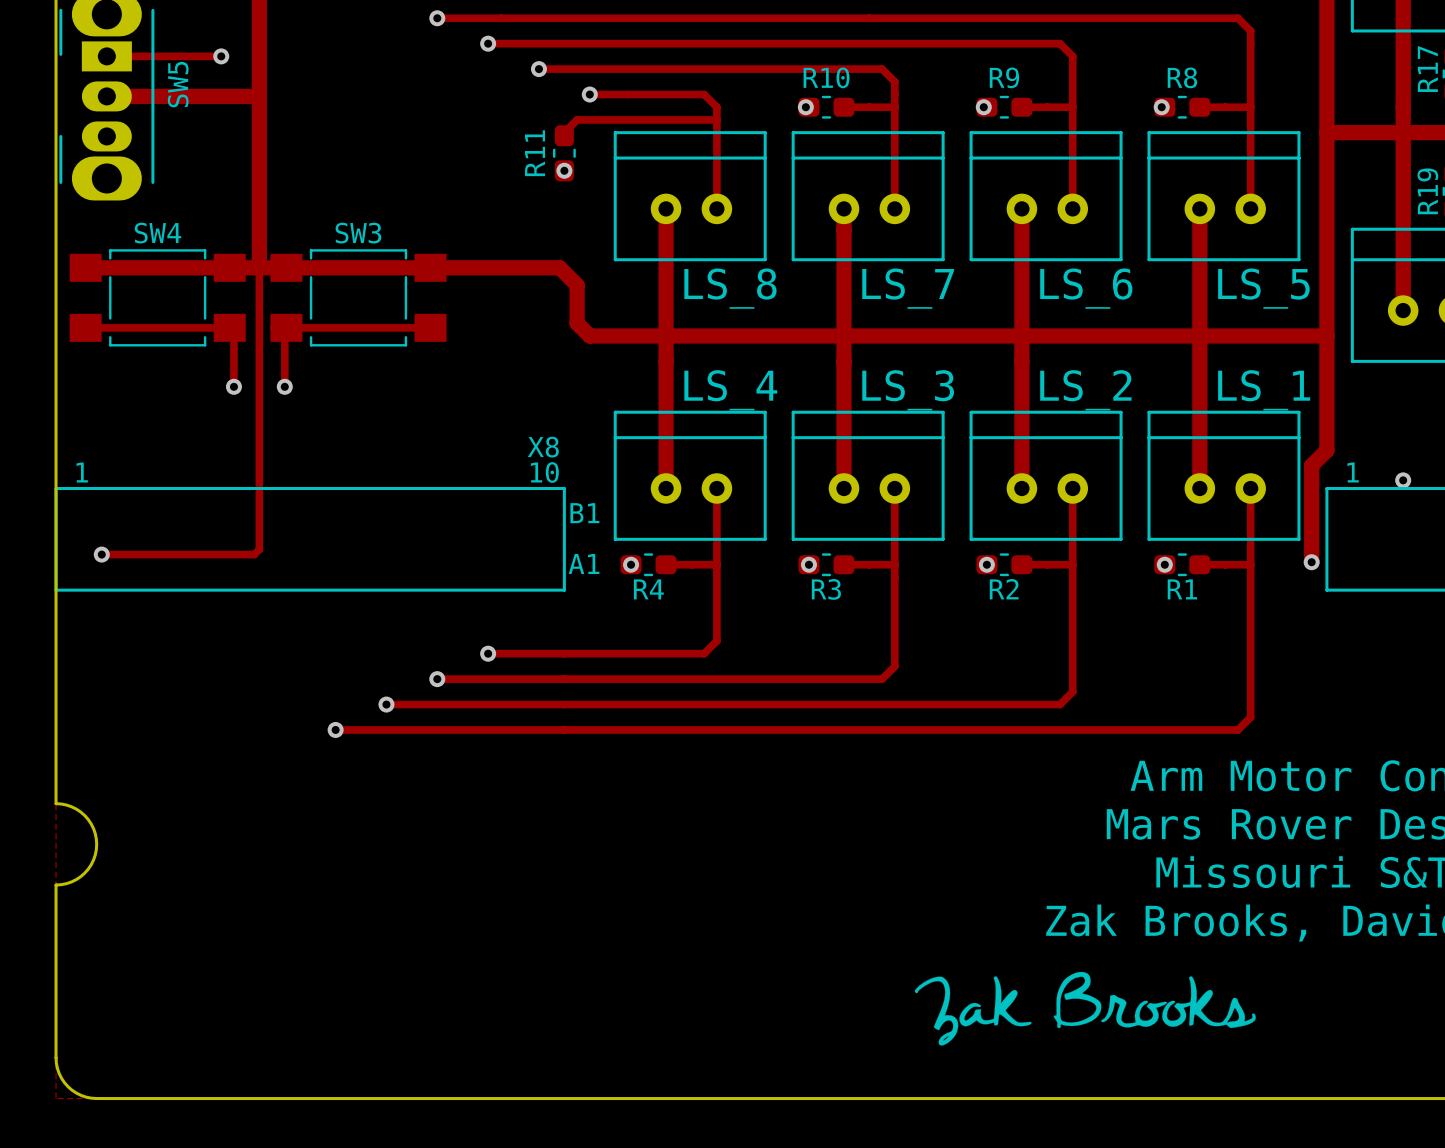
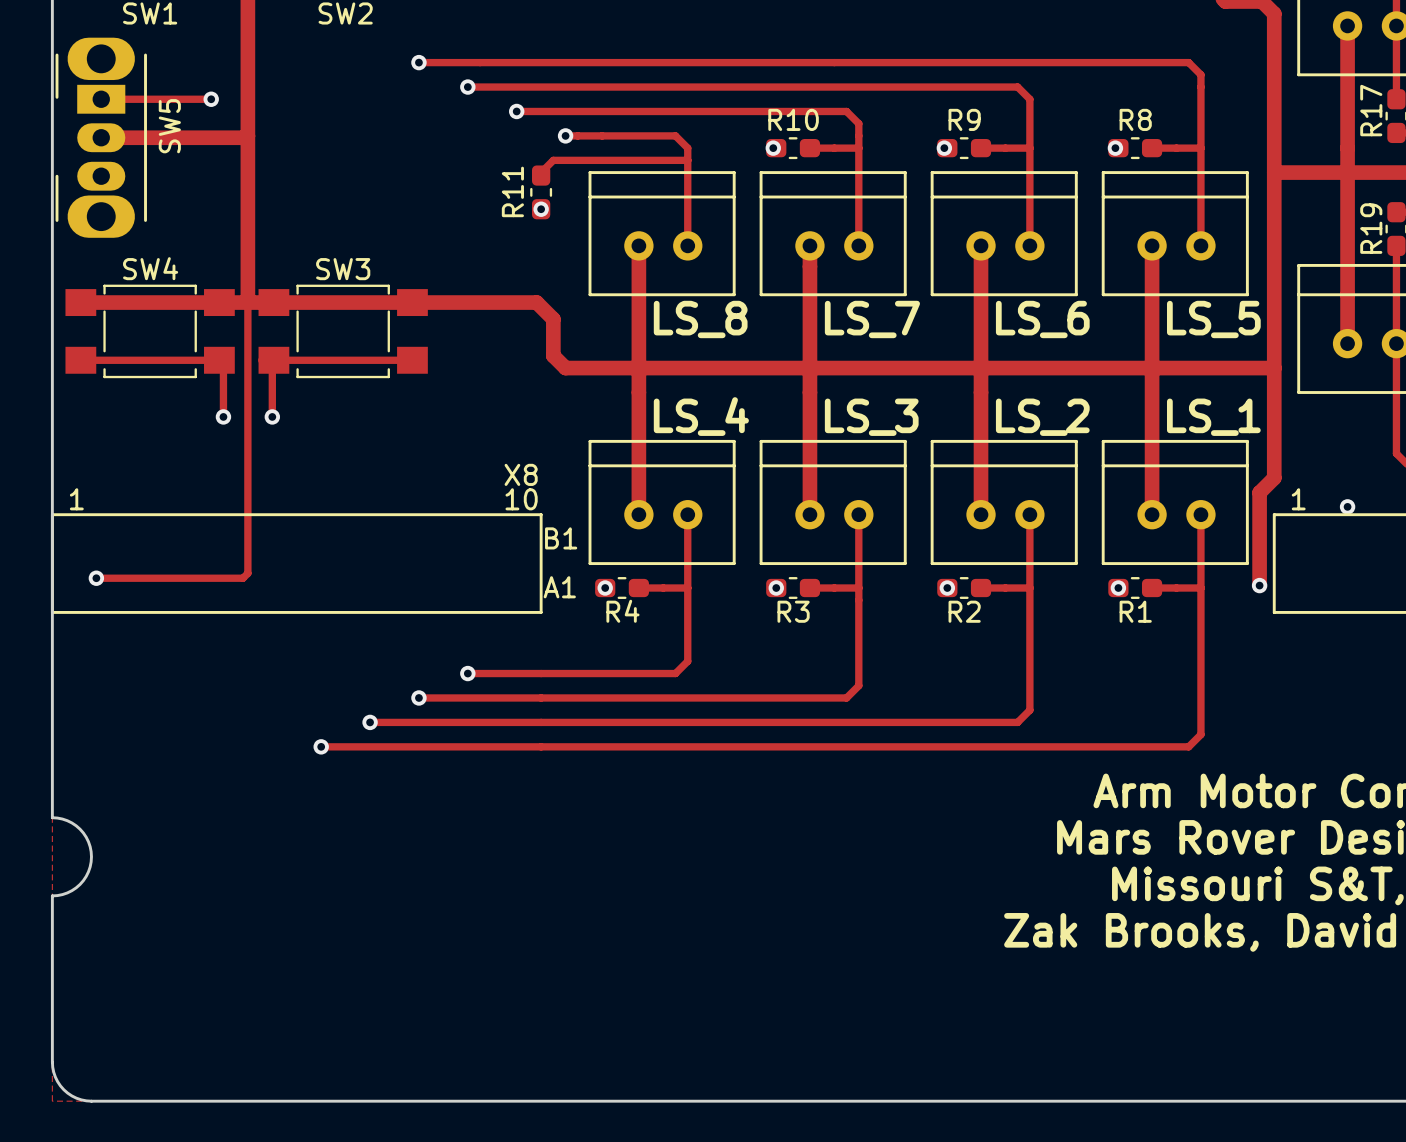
drawing: [914, 971, 1256, 1046] -> none

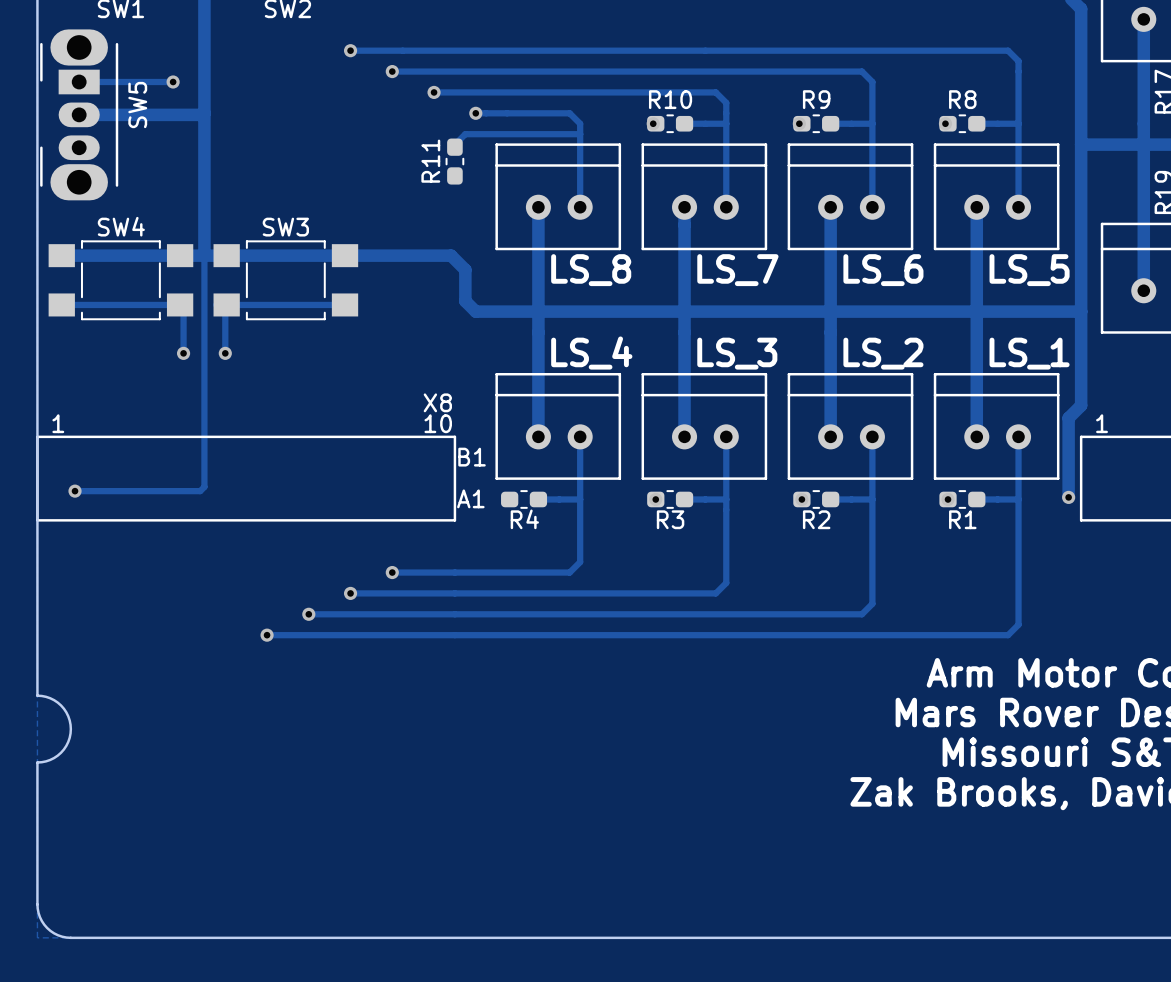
via: (541, 209) -> none
via: (1347, 506) -> none
via: (605, 588) -> none

